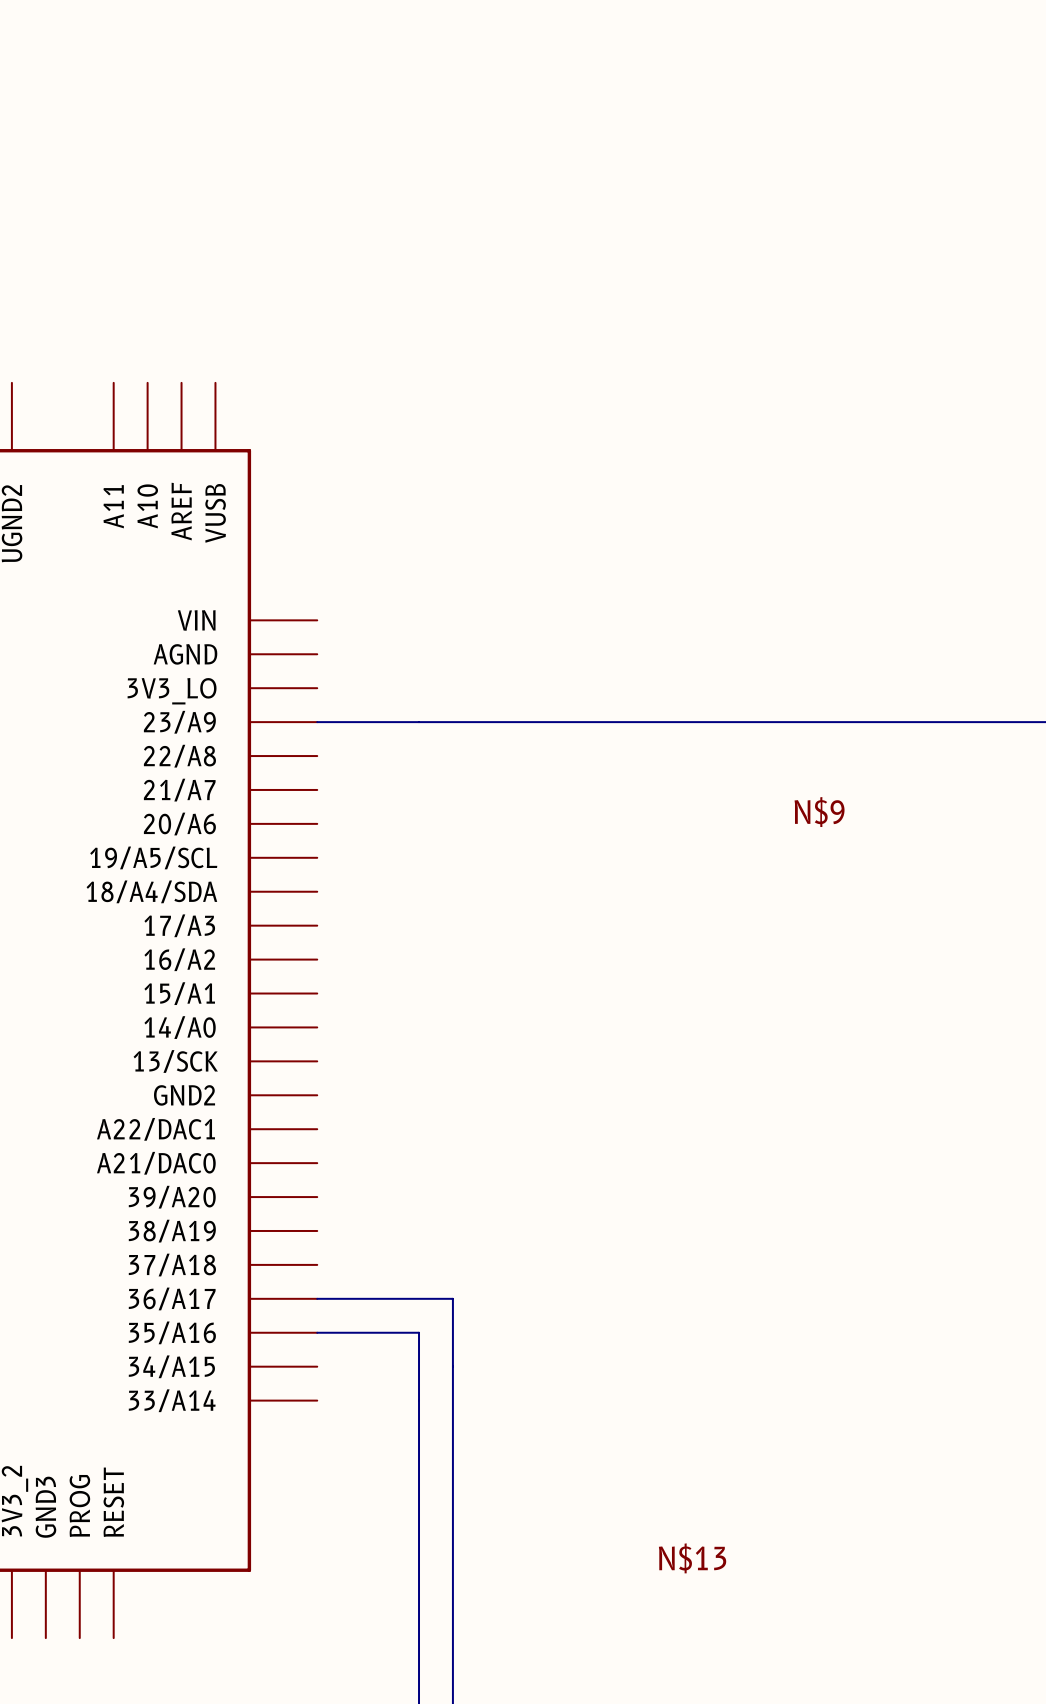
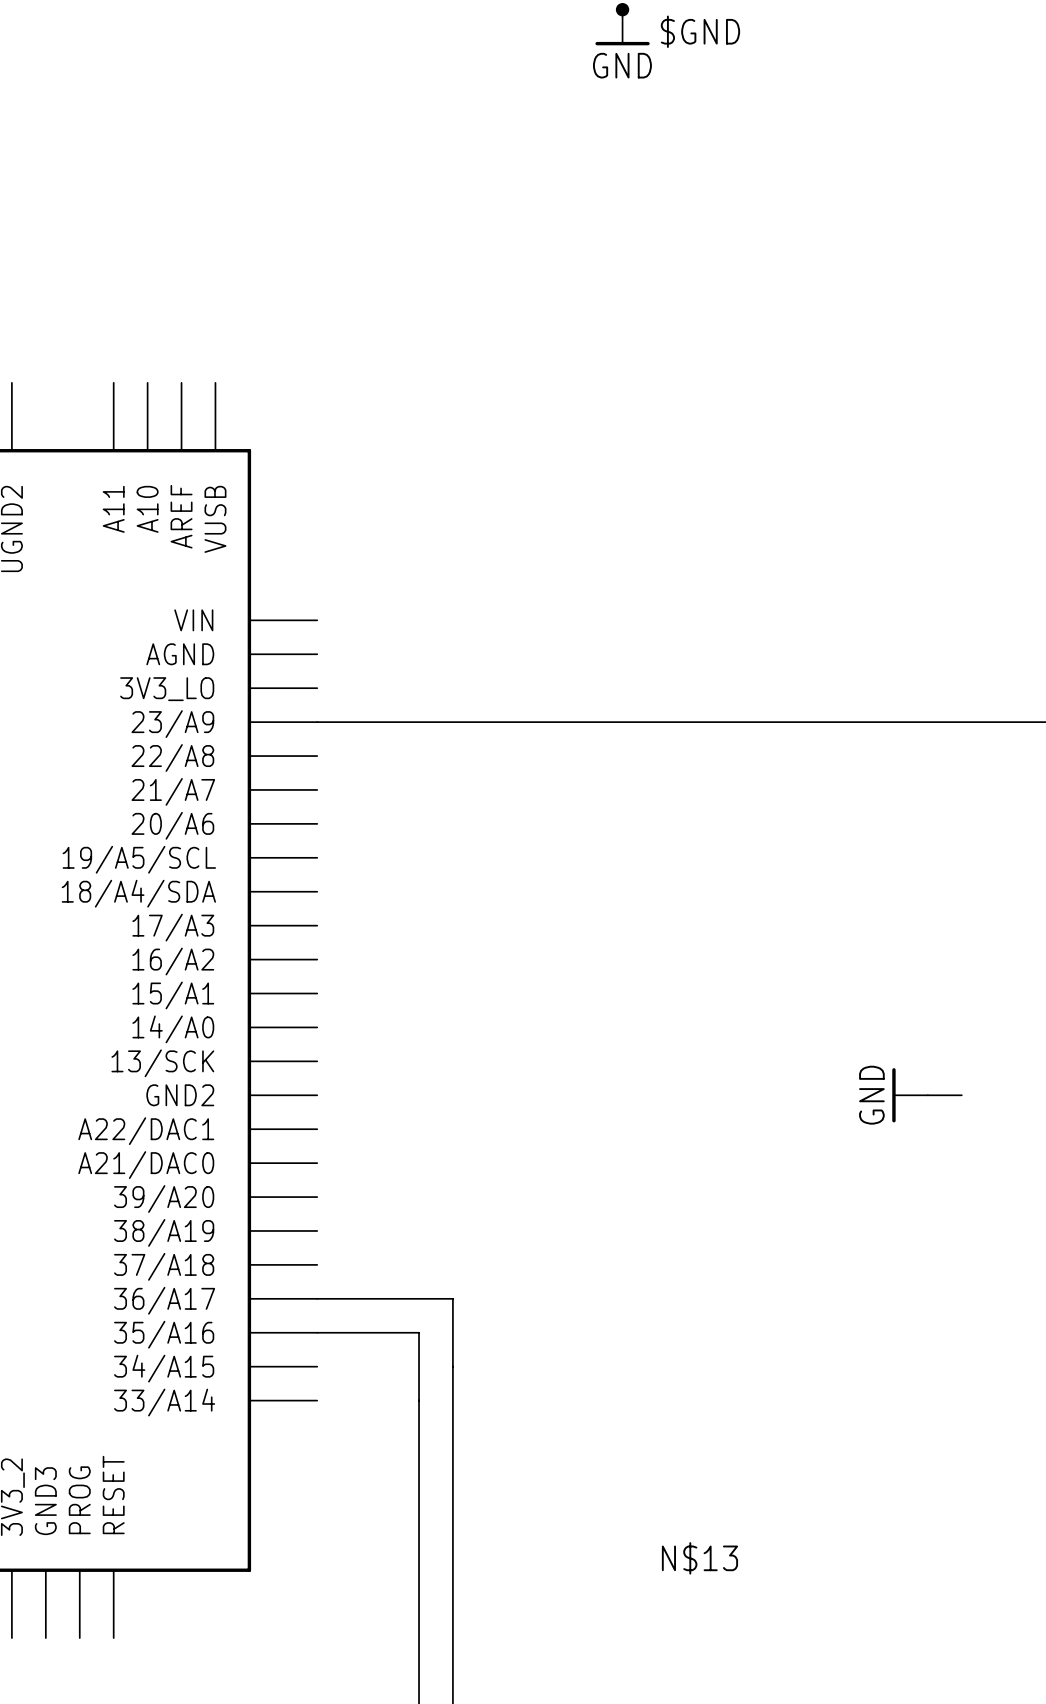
junction: none -> (622, 9)
power symbol: none -> GND (622, 27)
label: none -> $GND (700, 31)
label: N$9 (819, 812) -> none
power symbol: none -> GND (910, 1095)
wire: none -> (927, 1095) (961, 1095)

